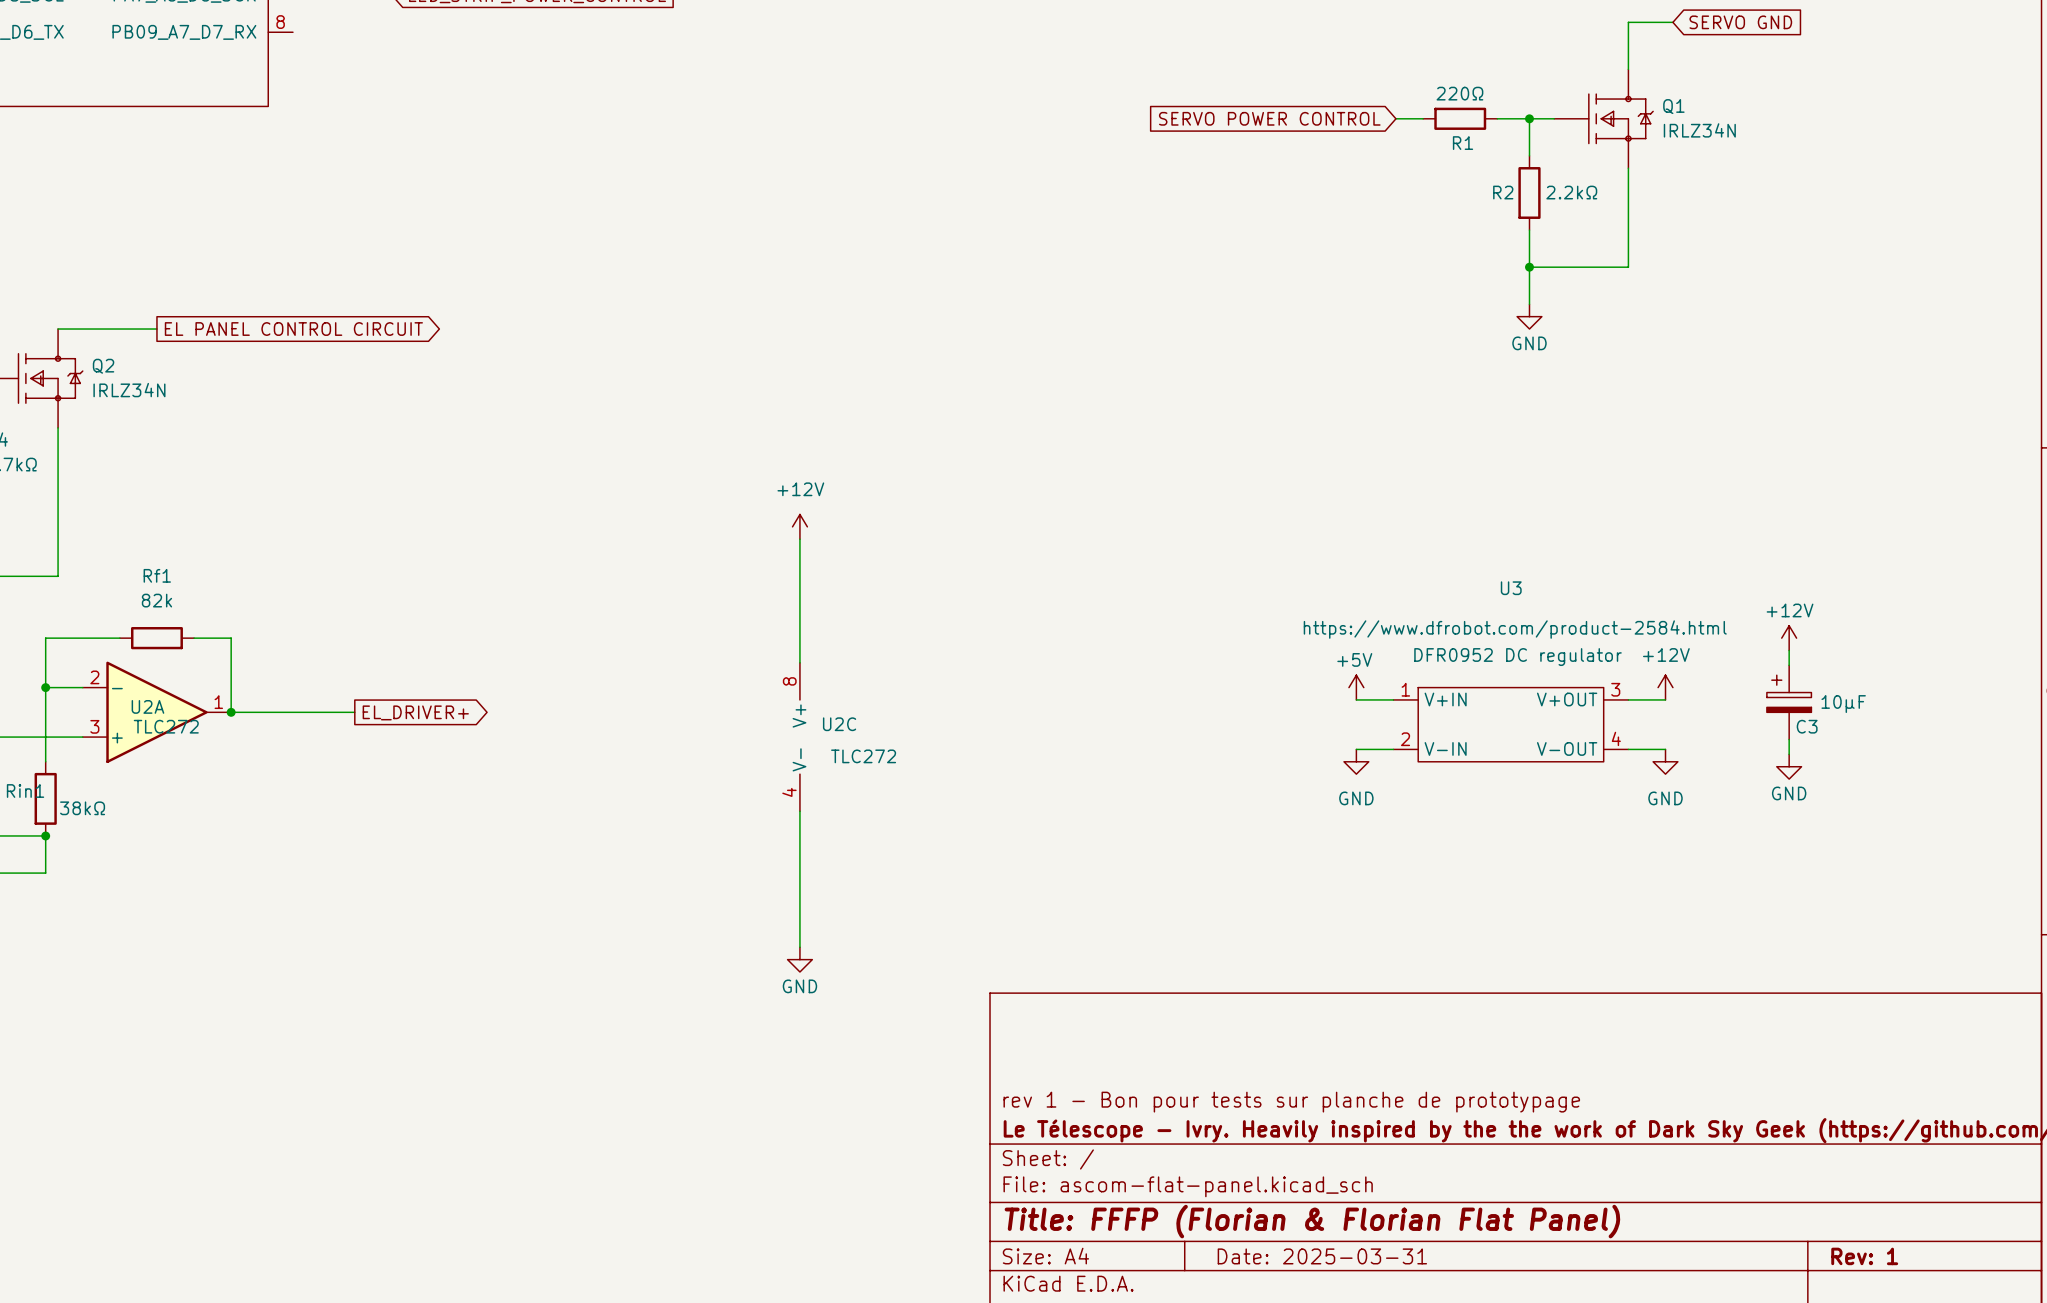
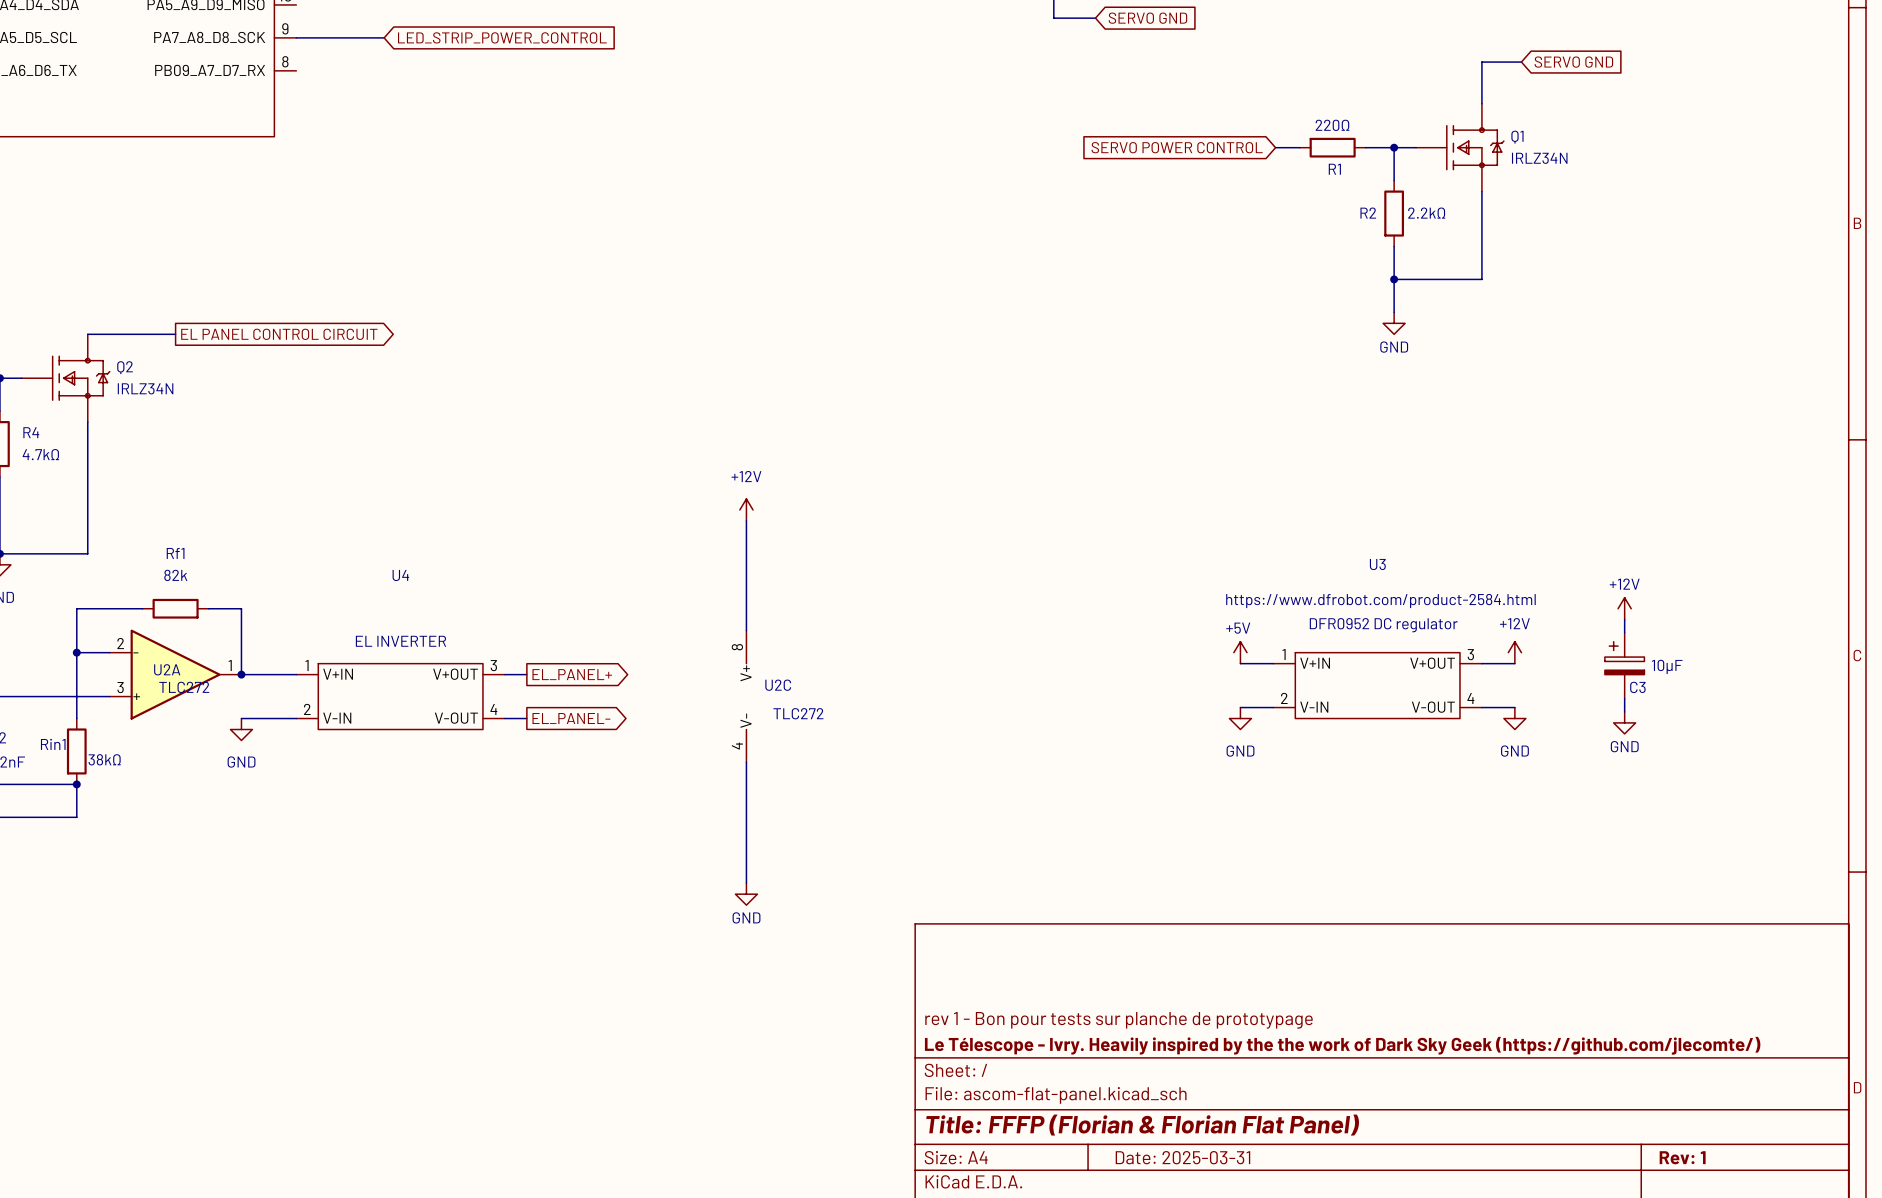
wire: (292, 712) (354, 712) -> (241, 718) (296, 718)
global label: EL_DRIVER+ (415, 712) -> none
wire: none -> (504, 674) (526, 674)
global label: none -> EL_PANEL+ (572, 674)
U4: none -> (400, 696)
wire: none -> (504, 718) (526, 718)
global label: none -> EL_PANEL- (571, 718)
power symbol: none -> GND (241, 729)

